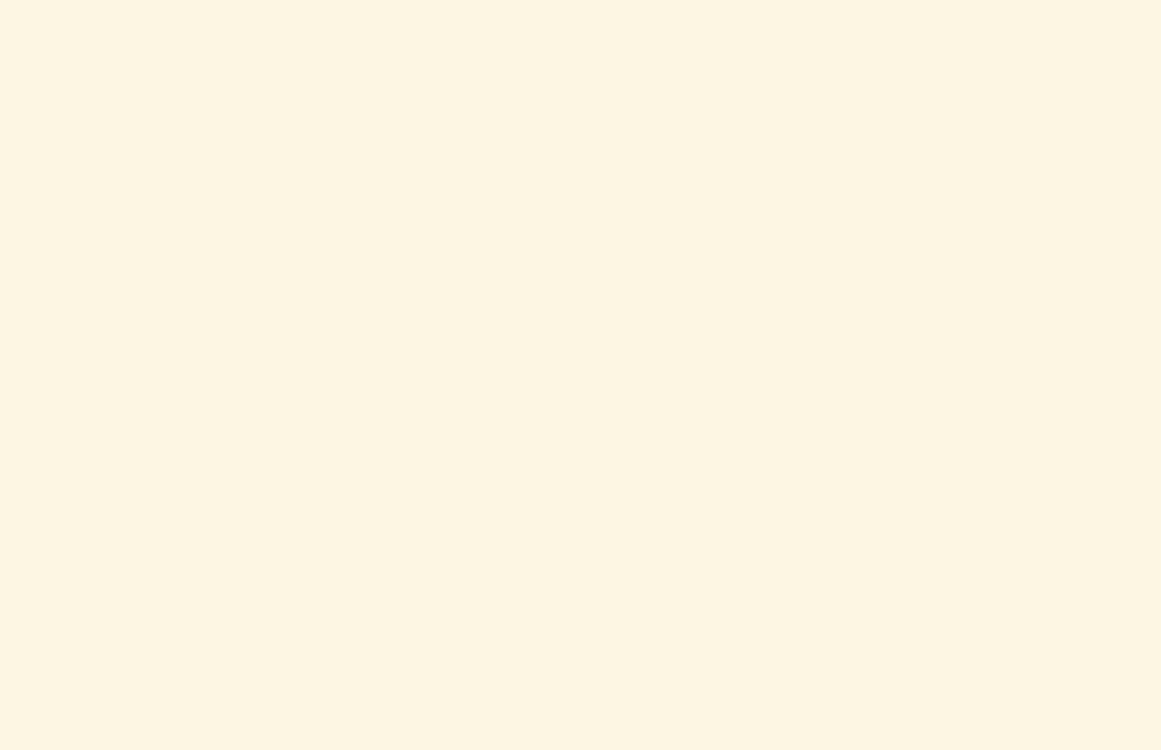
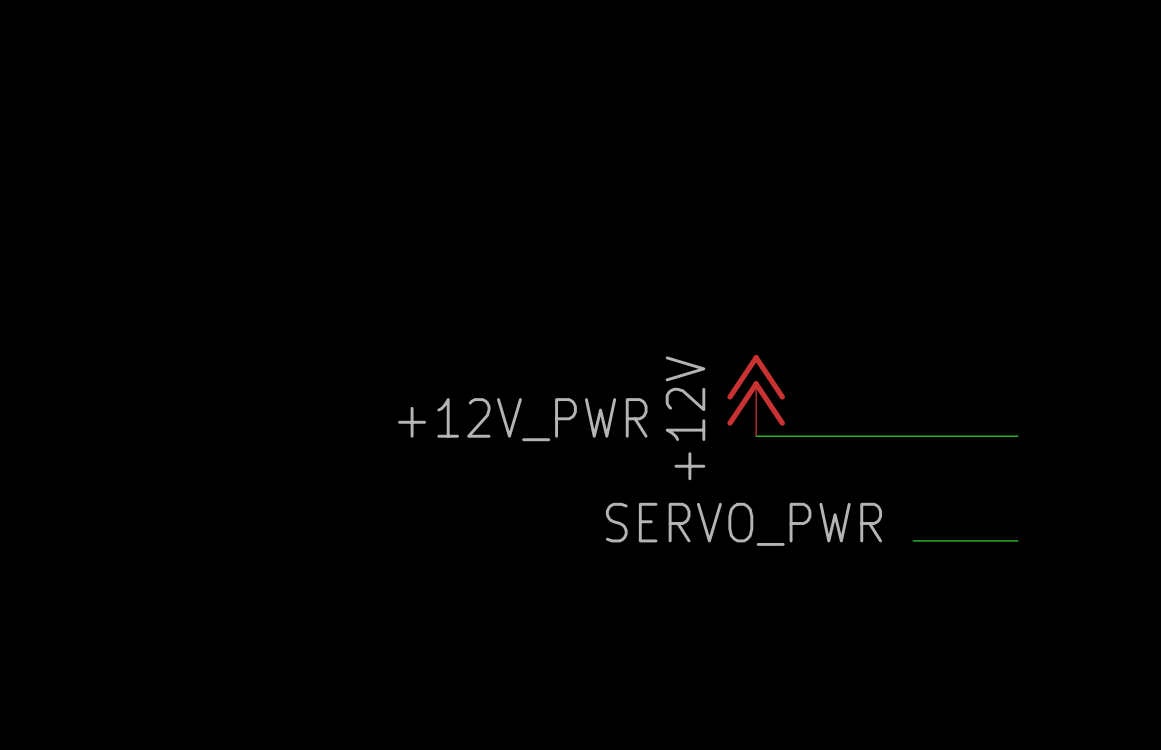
power symbol: none -> +12V (756, 395)
label: none -> +12V_PWR (522, 419)
wire: none -> (756, 436) (1017, 436)
label: none -> SERVO_PWR (743, 524)
wire: none -> (913, 540) (1017, 540)

